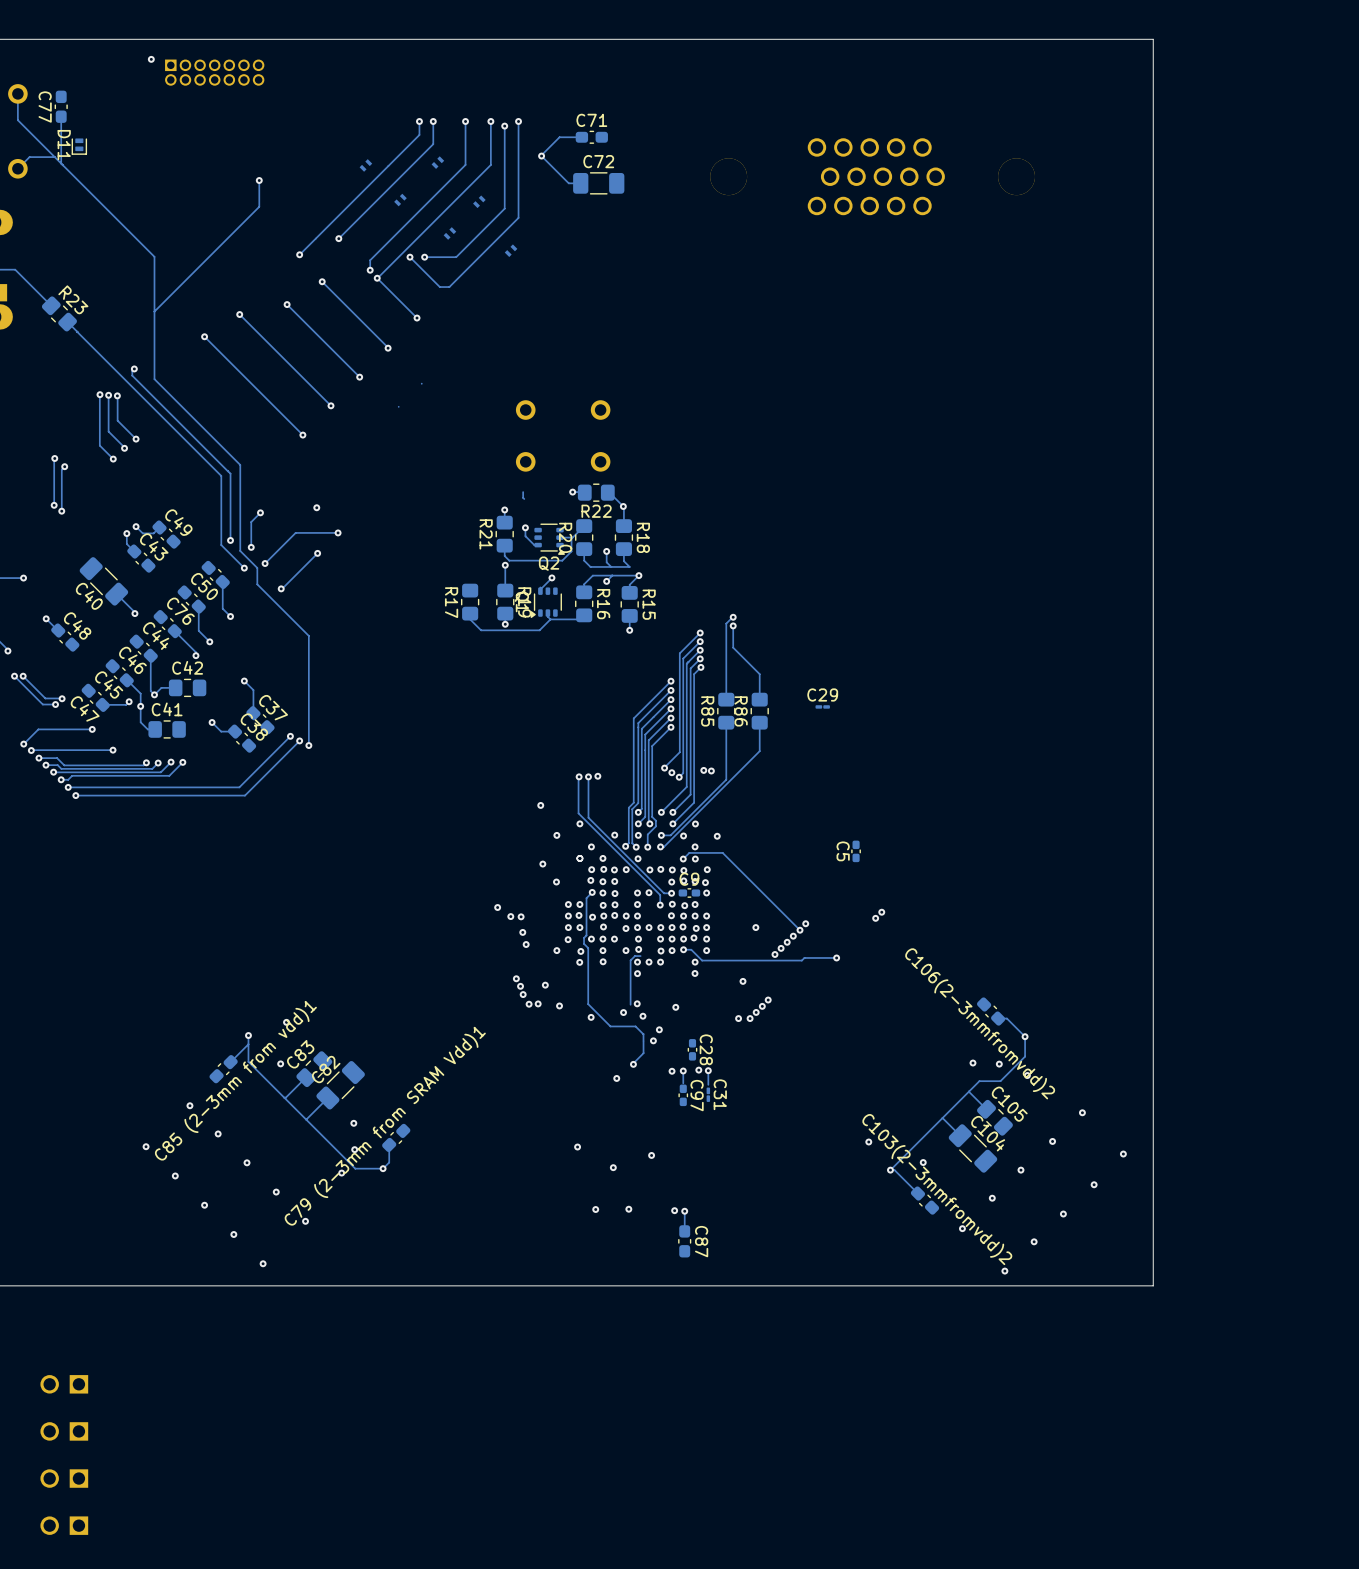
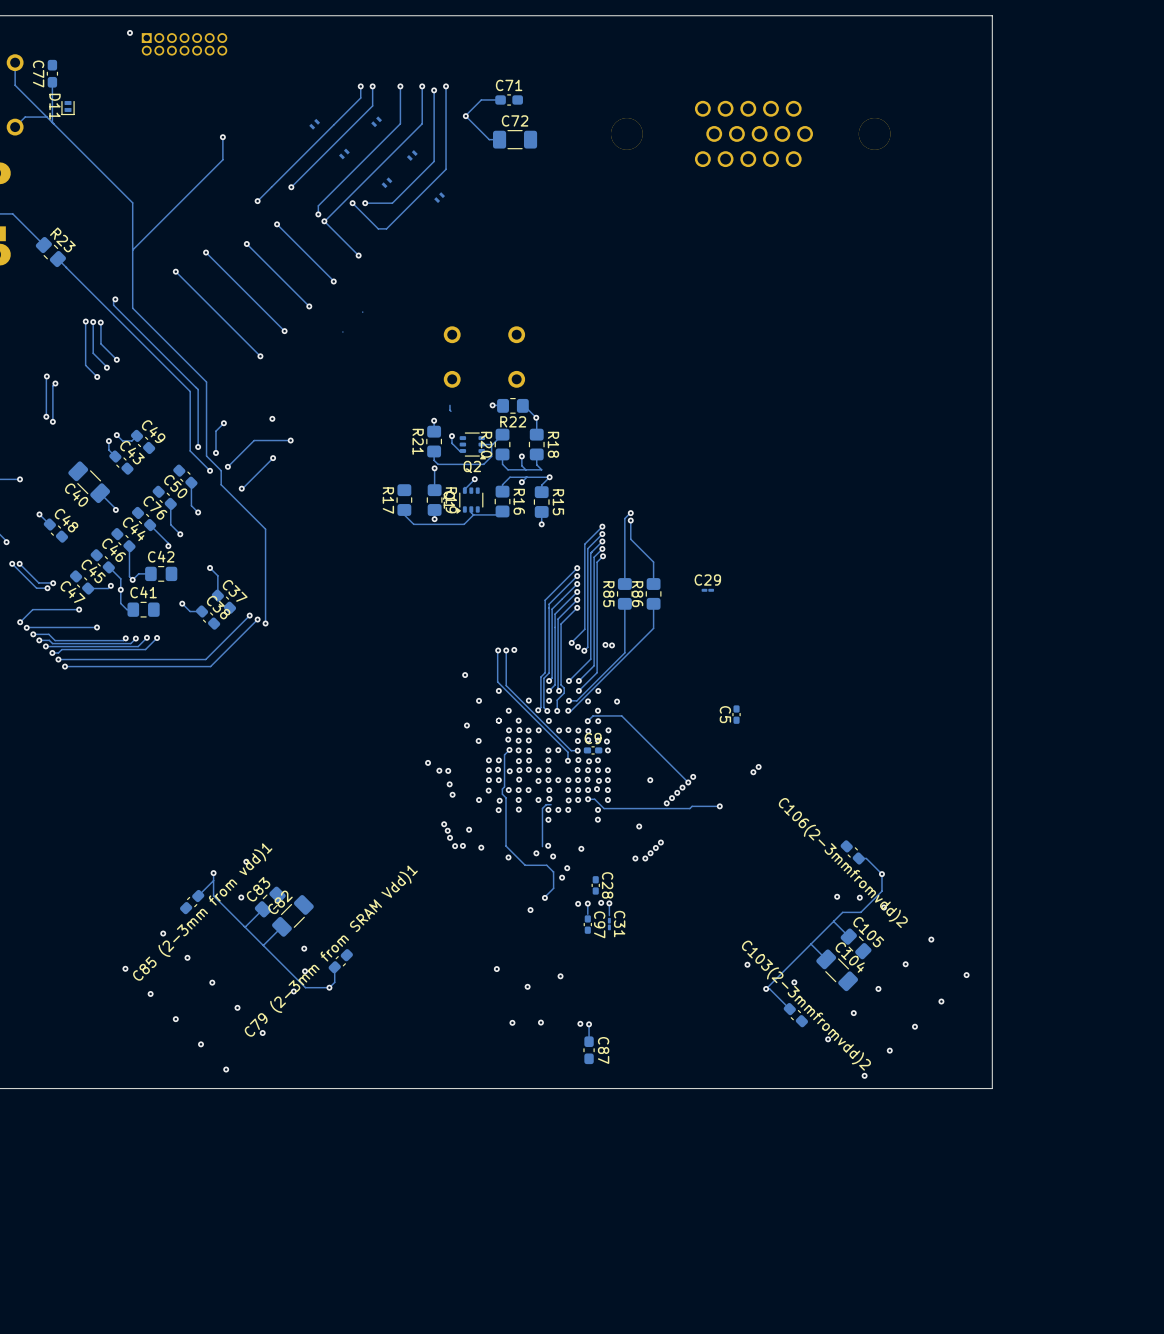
part: (64, 1384) -> none
part: (64, 1431) -> none
part: (64, 1478) -> none
part: (64, 1525) -> none

